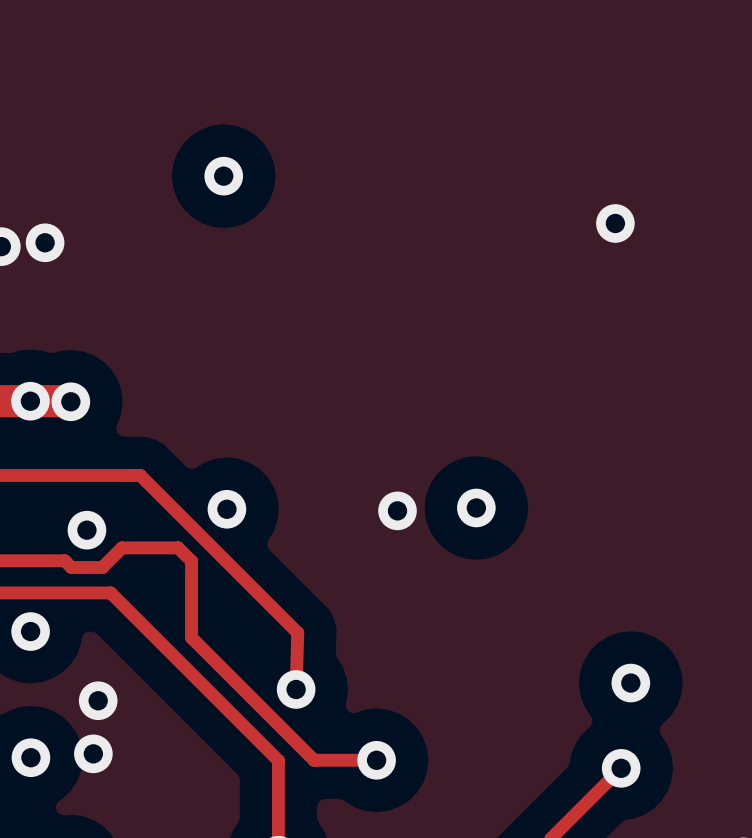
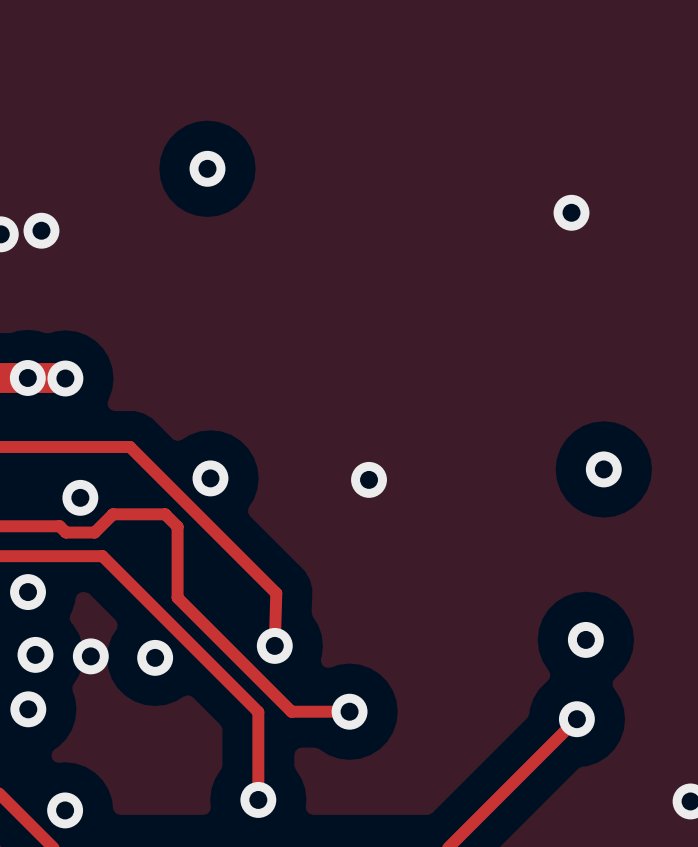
via position: (476, 507) -> (603, 469)
via: none -> (35, 654)
via: none -> (155, 657)
via: (93, 753) -> none

